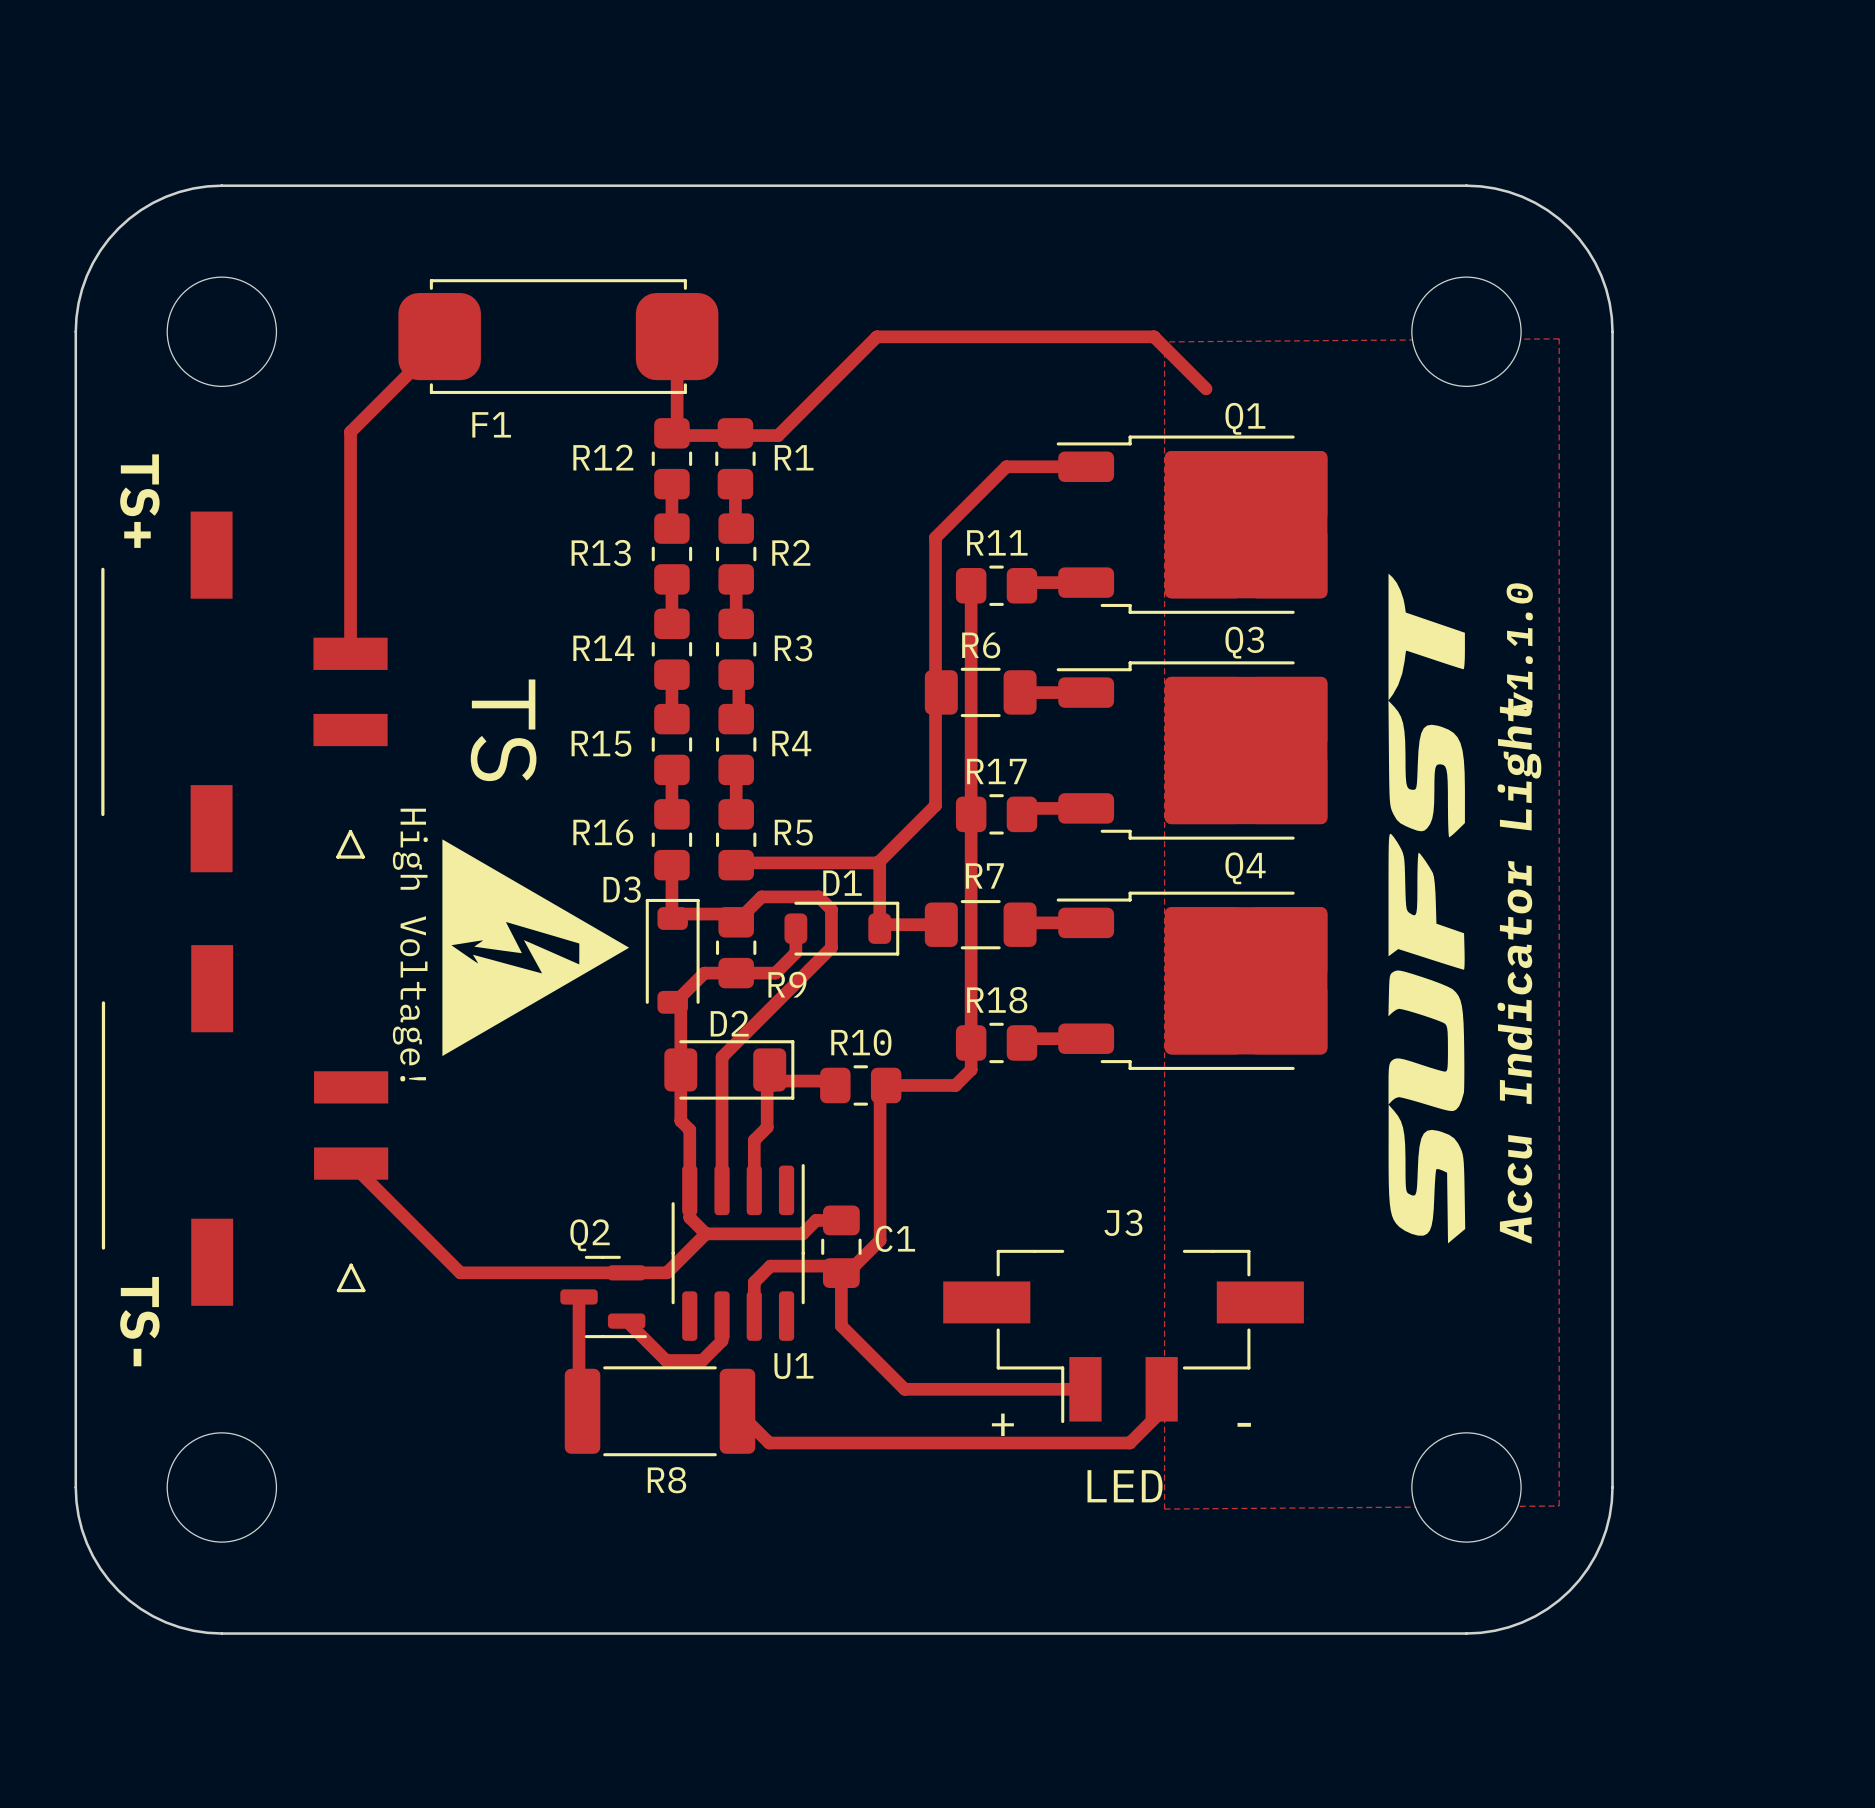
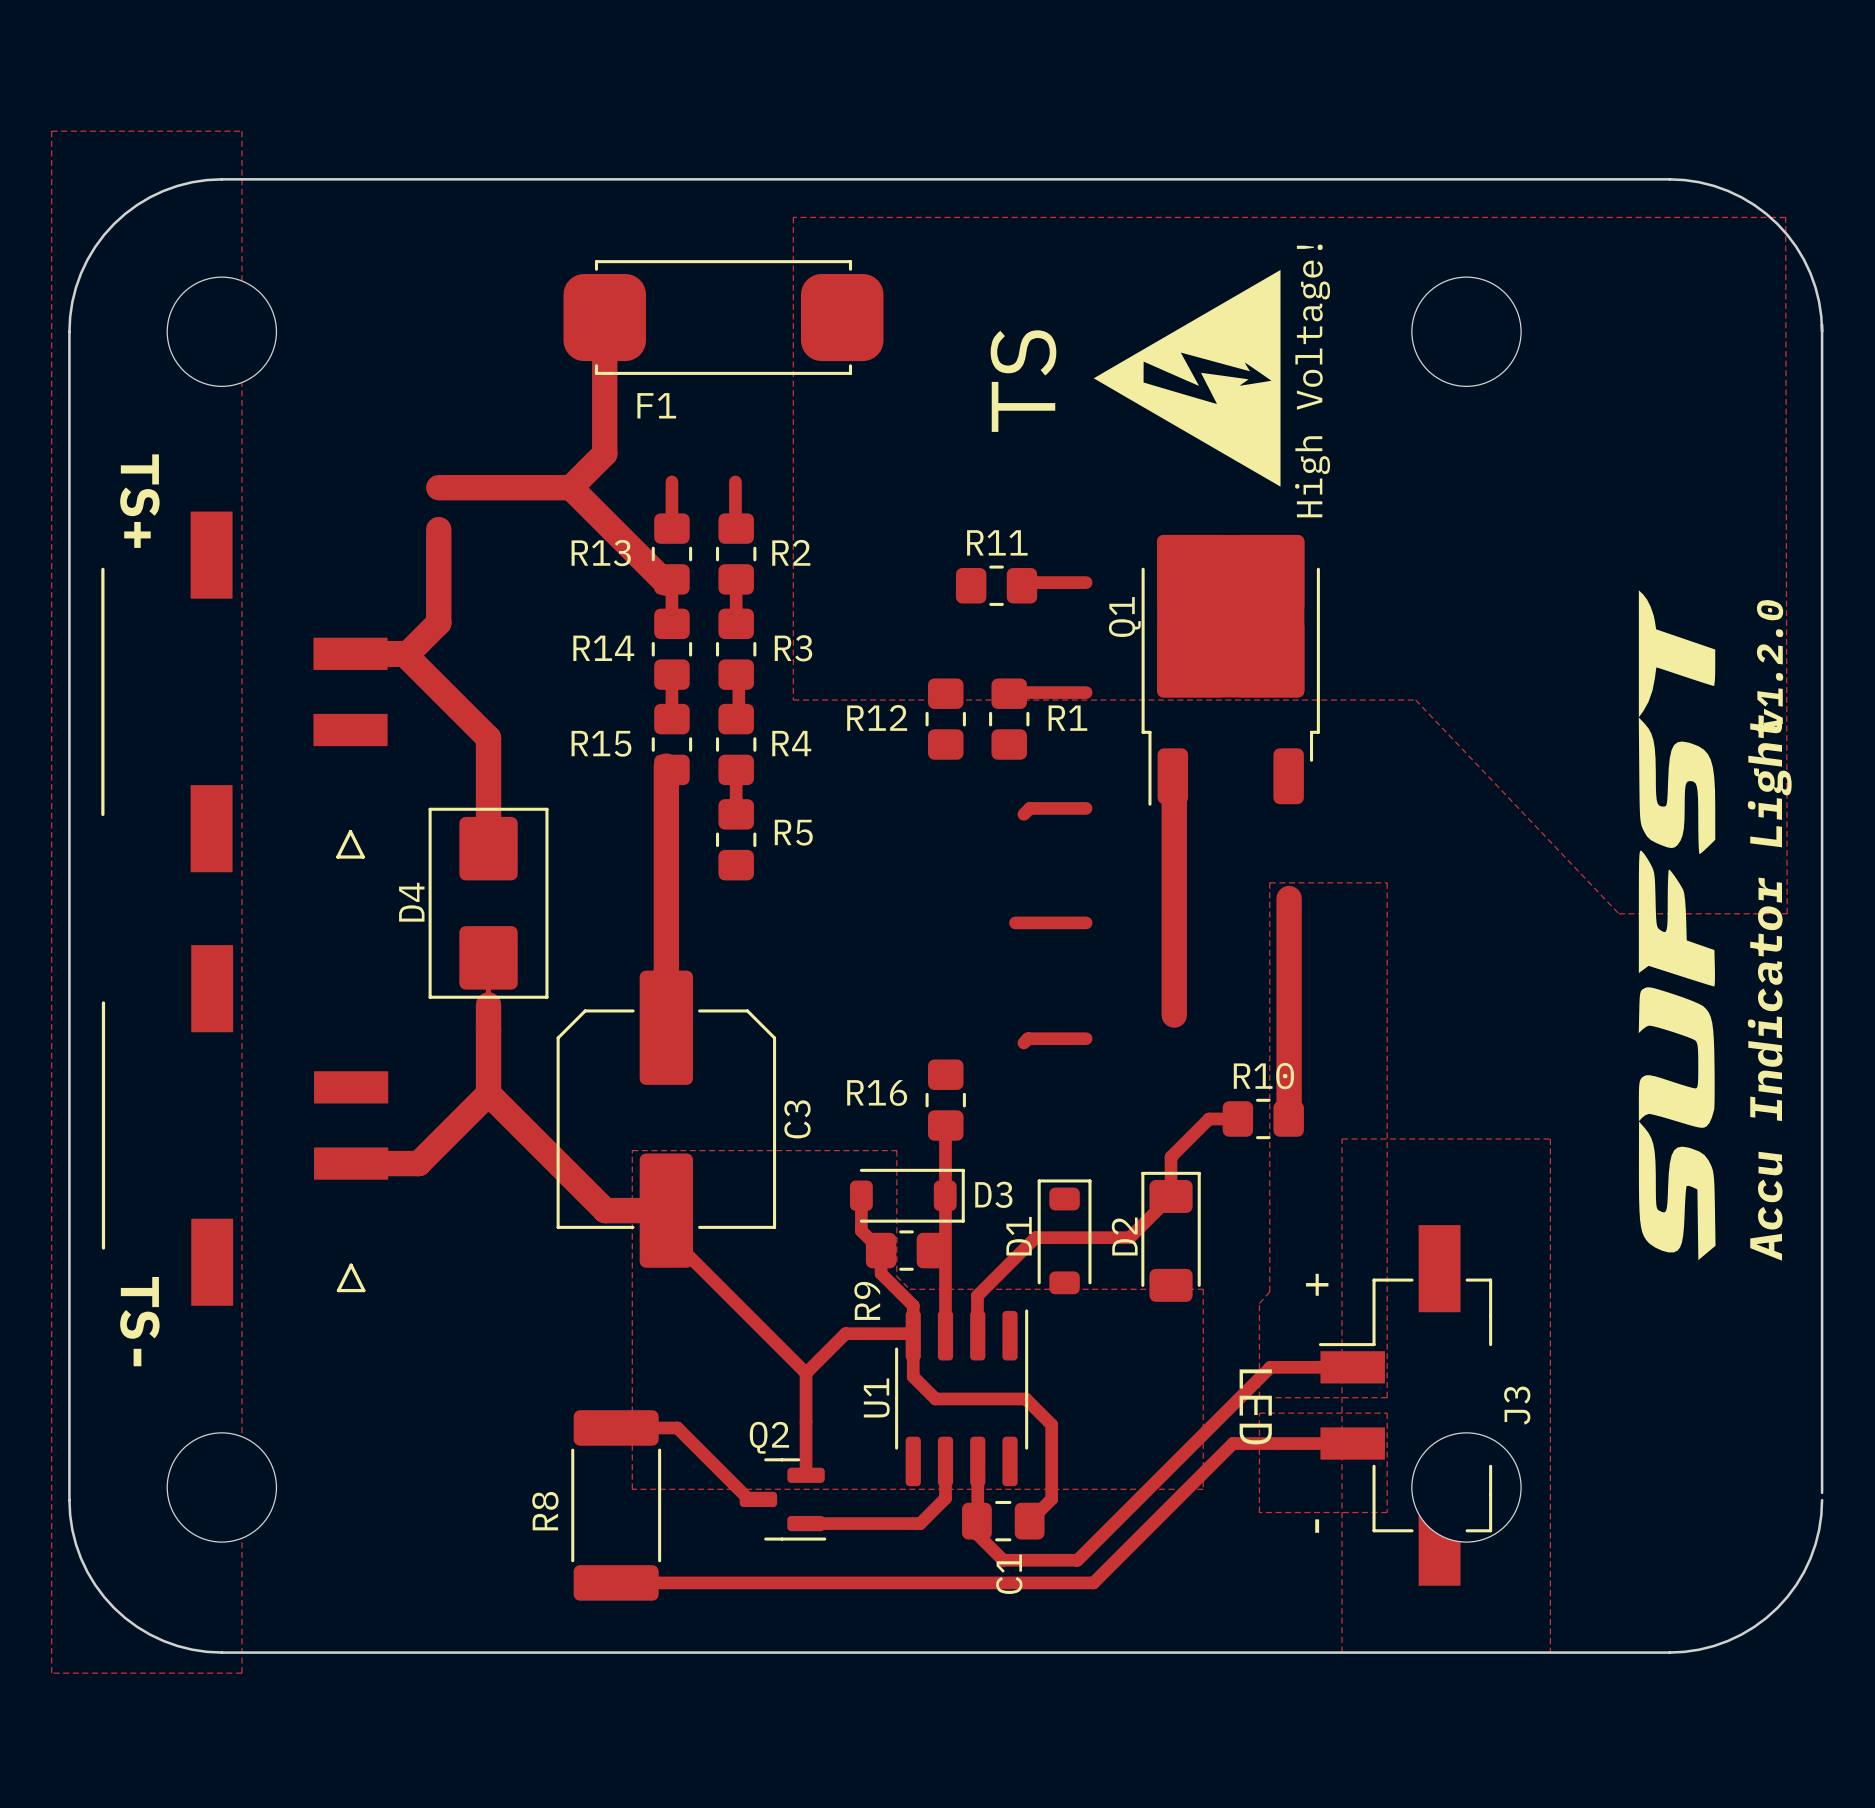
zone outline: none -> (51, 131) (51, 1673) (241, 1673) (241, 131) (51, 131)
board edge: (221, 185) (1466, 185) (1494, 188) (1522, 196) (1547, 210) (1569, 228) (1587, 250) (1601, 275) (1609, 303) (1612, 331) (1612, 1487) (1609, 1515) (1601, 1543) (1587, 1568) (1569, 1590) (1547, 1608) (1522, 1622) (1494, 1630) (1466, 1633) (221, 1633) (193, 1630) (165, 1622) (140, 1608) (118, 1590) (100, 1568) (86, 1543) (78, 1515) (75, 1487) (76, 317) (82, 289) (93, 262) (118, 228) (140, 210) (165, 196) (193, 188) (221, 185) -> none
zone outline: none -> (793, 217) (793, 700) (1415, 700) (1618, 913) (1787, 913) (1785, 217) (793, 217)
drawing: none -> [1093, 269, 1281, 487]
track: none -> (604, 317) (604, 453) (570, 487)
board edge: none -> (1822, 324) (1822, 1492)
board edge: none -> (1822, 331) (1819, 302) (1810, 273) (1796, 247) (1777, 223) (1754, 205) (1727, 190) (1699, 182) (1669, 179) (206, 180) (177, 185) (149, 197) (125, 213) (104, 235) (81, 273) (72, 302) (69, 331) (70, 1515) (81, 1558) (95, 1584) (114, 1607) (137, 1626) (177, 1646) (221, 1652) (1684, 1651) (1713, 1646) (1741, 1634) (1766, 1617) (1787, 1596) (1810, 1558) (1819, 1529) (1822, 1500)
track: (439, 336) (439, 342) (350, 432) (350, 653) -> (438, 529) (438, 622) (407, 653) (350, 653)
F1 position: (558, 336) -> (723, 317)
track: (677, 336) (677, 430) (671, 435) (778, 435) (876, 336) (1154, 336) (1206, 388) -> none
zone outline: (1559, 338) (1559, 1506) (1164, 1509) (1164, 341) (1559, 338) -> none
text: none -> High Voltage! (1312, 380)
R12 position: (671, 458) -> (945, 719)
R1 position: (735, 458) -> (1009, 719)
track: (1086, 466) (1006, 466) (935, 537) (935, 805) (878, 862) (736, 862) -> none
track: none -> (438, 487) (570, 487)
track: none -> (570, 487) (666, 583)
Q1 rotation: 0° (1192, 524) -> 90° counterclockwise (1230, 670)
track: (971, 585) (971, 1069) (955, 1085) (881, 1085) (880, 1087) (880, 1240) (854, 1266) (770, 1266) (754, 1282) (754, 1316) -> none
text: v1.1.0 (1519, 647) -> none
track: none -> (404, 653) (488, 738) (488, 848)
text: none -> v1.2.0 (1770, 664)
R6: (980, 692) -> none
text rotation: 0° (503, 730) -> 180° (1023, 381)
text position: TS (503, 730) -> TS (1023, 381)
Q3: (1192, 750) -> none
track: none -> (666, 766) (666, 1027)
track: none -> (1174, 777) (1174, 1015)
R17: (996, 814) -> none
drawing: [442, 839, 630, 1057] -> none
R16 position: (671, 839) -> (945, 1100)
track: (879, 861) (879, 928) (883, 924) (941, 924) -> none
track: (671, 862) (672, 918) (677, 914) (744, 914) (761, 896) (818, 896) (831, 909) (831, 947) (722, 1057) (722, 1190) -> none
zone outline: none -> (1269, 882) (1269, 1291) (1259, 1303) (1259, 1397) (1387, 1397) (1387, 882) (1269, 882)
D3 name position: D3 (622, 889) -> D3 (993, 1194)
track: none -> (1289, 898) (1288, 1118)
D4: none -> (488, 903)
drawing position: (1426, 908) -> (1677, 925)
R7: (980, 924) -> none
track: (795, 928) (795, 952) (775, 973) (704, 973) (680, 996) (680, 1120) (689, 1129) (689, 1217) (705, 1233) -> none
D1 rotation: 0° (841, 928) -> 90° counterclockwise (1064, 1236)
D1 position: (841, 928) -> (1064, 1236)
text: High Voltage! (410, 945) -> none
R9 rotation: 0° (736, 947) -> 90° clockwise (906, 1250)
R9 position: (736, 947) -> (906, 1250)
D3 rotation: 0° (672, 956) -> 90° clockwise (907, 1195)
D3 position: (672, 956) -> (907, 1195)
track: none -> (488, 957) (488, 1093)
text position: Accu Indicator Light (1519, 971) -> Accu Indicator Light (1769, 987)
Q4: (1192, 980) -> none
R18: (996, 1042) -> none
D2 rotation: 0° (729, 1069) -> 90° counterclockwise (1171, 1236)
D2 position: (729, 1069) -> (1171, 1236)
track: (826, 1085) (822, 1081) (778, 1081) (767, 1091) (767, 1127) (754, 1140) (754, 1190) -> none
R10 position: (860, 1085) -> (1263, 1118)
track: none -> (488, 1093) (605, 1210) (666, 1210) (666, 1233) (806, 1373)
track: none -> (1237, 1118) (1209, 1118) (1171, 1157) (1171, 1196) (1129, 1237) (1035, 1237) (977, 1295) (977, 1335)
C3: none -> (666, 1119)
track: none -> (945, 1125) (945, 1335)
zone outline: none -> (1342, 1138) (1550, 1138) (1550, 1652) (1342, 1652) (1342, 1138)
zone outline: none -> (632, 1150) (896, 1150) (896, 1276) (909, 1289) (1203, 1289) (1203, 1489) (632, 1489) (632, 1150)
track: (351, 1163) (460, 1272) (666, 1272) (705, 1233) -> (351, 1163) (418, 1163) (488, 1093)
track: none -> (861, 1195) (861, 1230) (881, 1250) (881, 1273) (913, 1305) (913, 1376) (935, 1398) (1025, 1398) (1051, 1424) (1051, 1499) (1029, 1521)
track: (841, 1220) (816, 1220) (802, 1233) (705, 1233) -> none
C1 rotation: 0° (841, 1246) -> 90° clockwise (1003, 1521)
C1 position: (841, 1246) -> (1003, 1521)
U1 position: (738, 1252) -> (961, 1397)
track: (841, 1273) (841, 1325) (904, 1389) (1085, 1389) -> none
track: (579, 1296) (579, 1407) (582, 1411) -> none
Q2 position: (603, 1296) -> (783, 1499)
track: (722, 1316) (722, 1340) (702, 1360) (666, 1360) (626, 1321) -> none
track: none -> (913, 1333) (845, 1333) (806, 1373)
J3 rotation: 0° (1123, 1336) -> 90° clockwise (1405, 1405)
J3 position: (1123, 1336) -> (1405, 1405)
U1 name rotation: 0° (793, 1366) -> 90° counterclockwise (876, 1397)
U1 name position: U1 (793, 1366) -> U1 (876, 1397)
track: none -> (1352, 1367) (1270, 1367) (1077, 1560) (1003, 1560) (976, 1533) (977, 1461)
track: none -> (806, 1373) (806, 1475)
track: (1161, 1389) (1161, 1411) (1129, 1443) (769, 1443) (737, 1411) -> none
R8 rotation: 0° (659, 1411) -> 90° clockwise (616, 1505)
zone outline: none -> (1259, 1413) (1387, 1413) (1387, 1512) (1259, 1512) (1259, 1413)
text rotation: 0° (1002, 1424) -> 90° clockwise (1317, 1284)
text position: + (1002, 1424) -> + (1317, 1284)
text rotation: 0° (1244, 1424) -> 90° clockwise (1317, 1526)
text position: - (1244, 1424) -> - (1317, 1526)
track: none -> (616, 1427) (677, 1427) (748, 1499) (758, 1499)
track: none -> (1352, 1443) (1232, 1443) (1093, 1582) (616, 1582)
track: none -> (945, 1484) (945, 1498) (920, 1523) (806, 1523)
text rotation: 0° (1125, 1486) -> 90° clockwise (1255, 1406)
text position: LED (1125, 1486) -> LED (1255, 1406)

